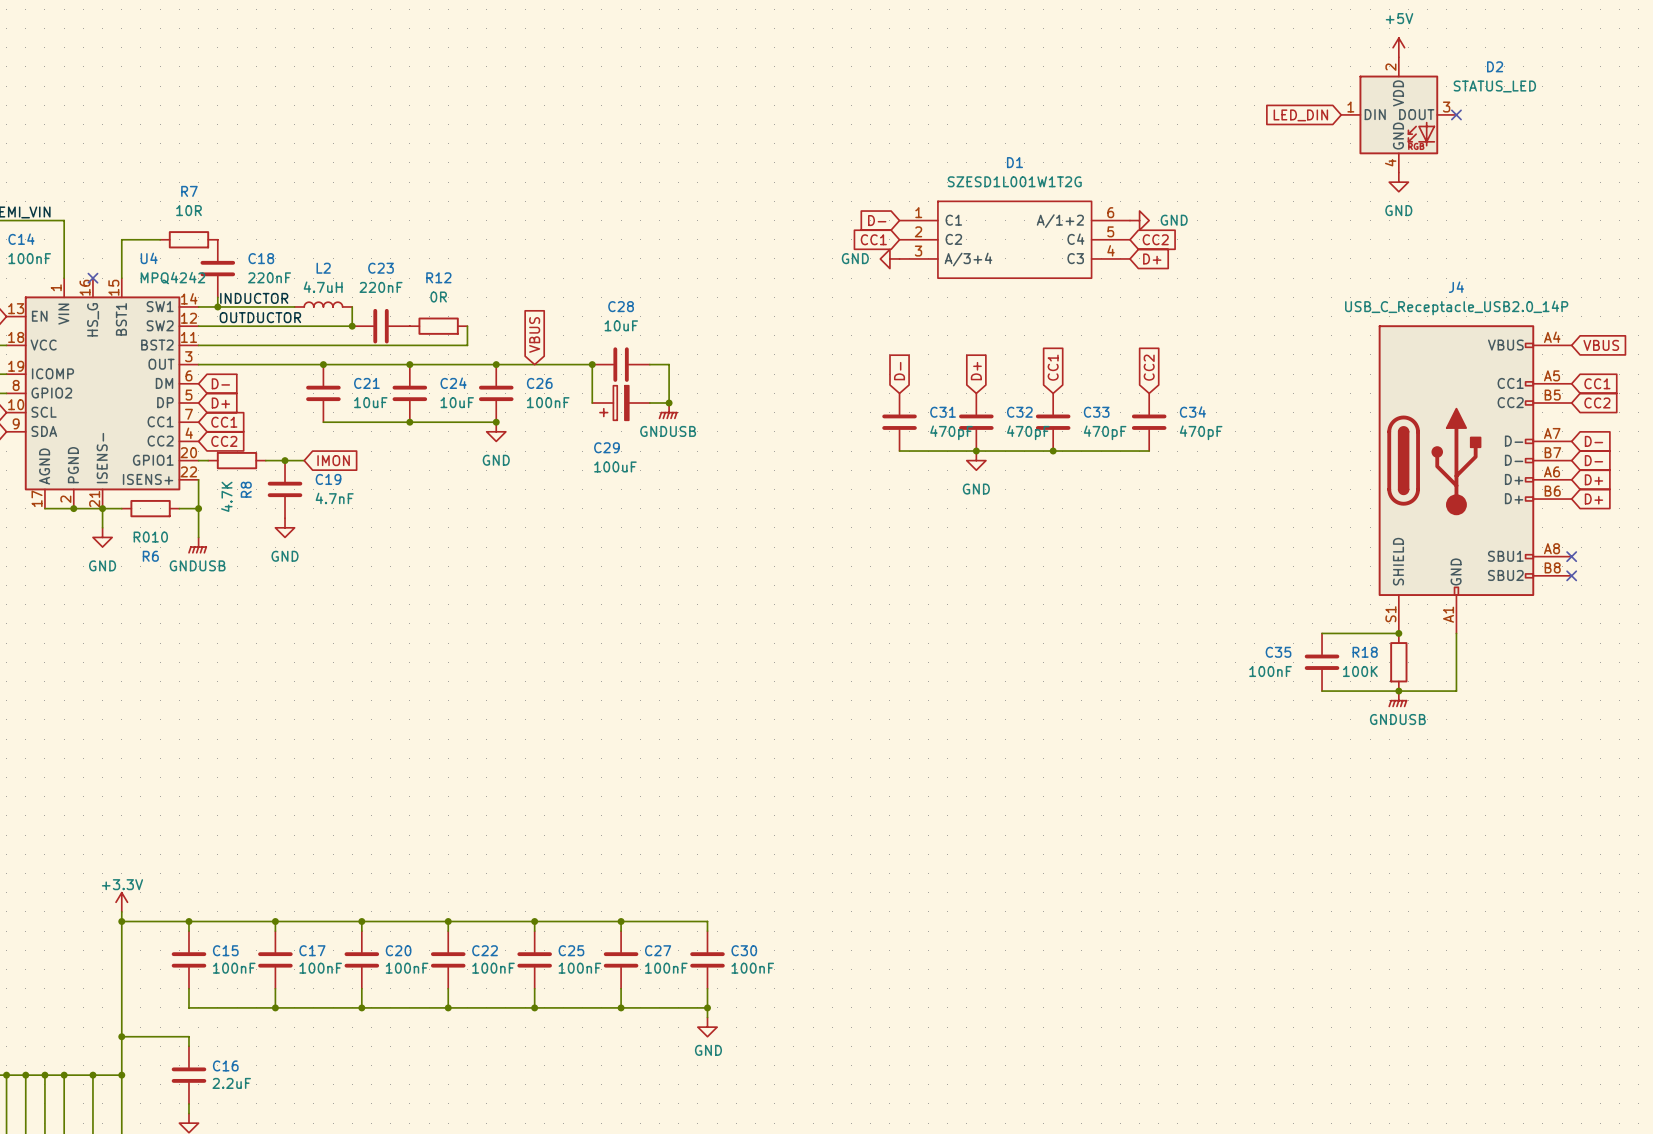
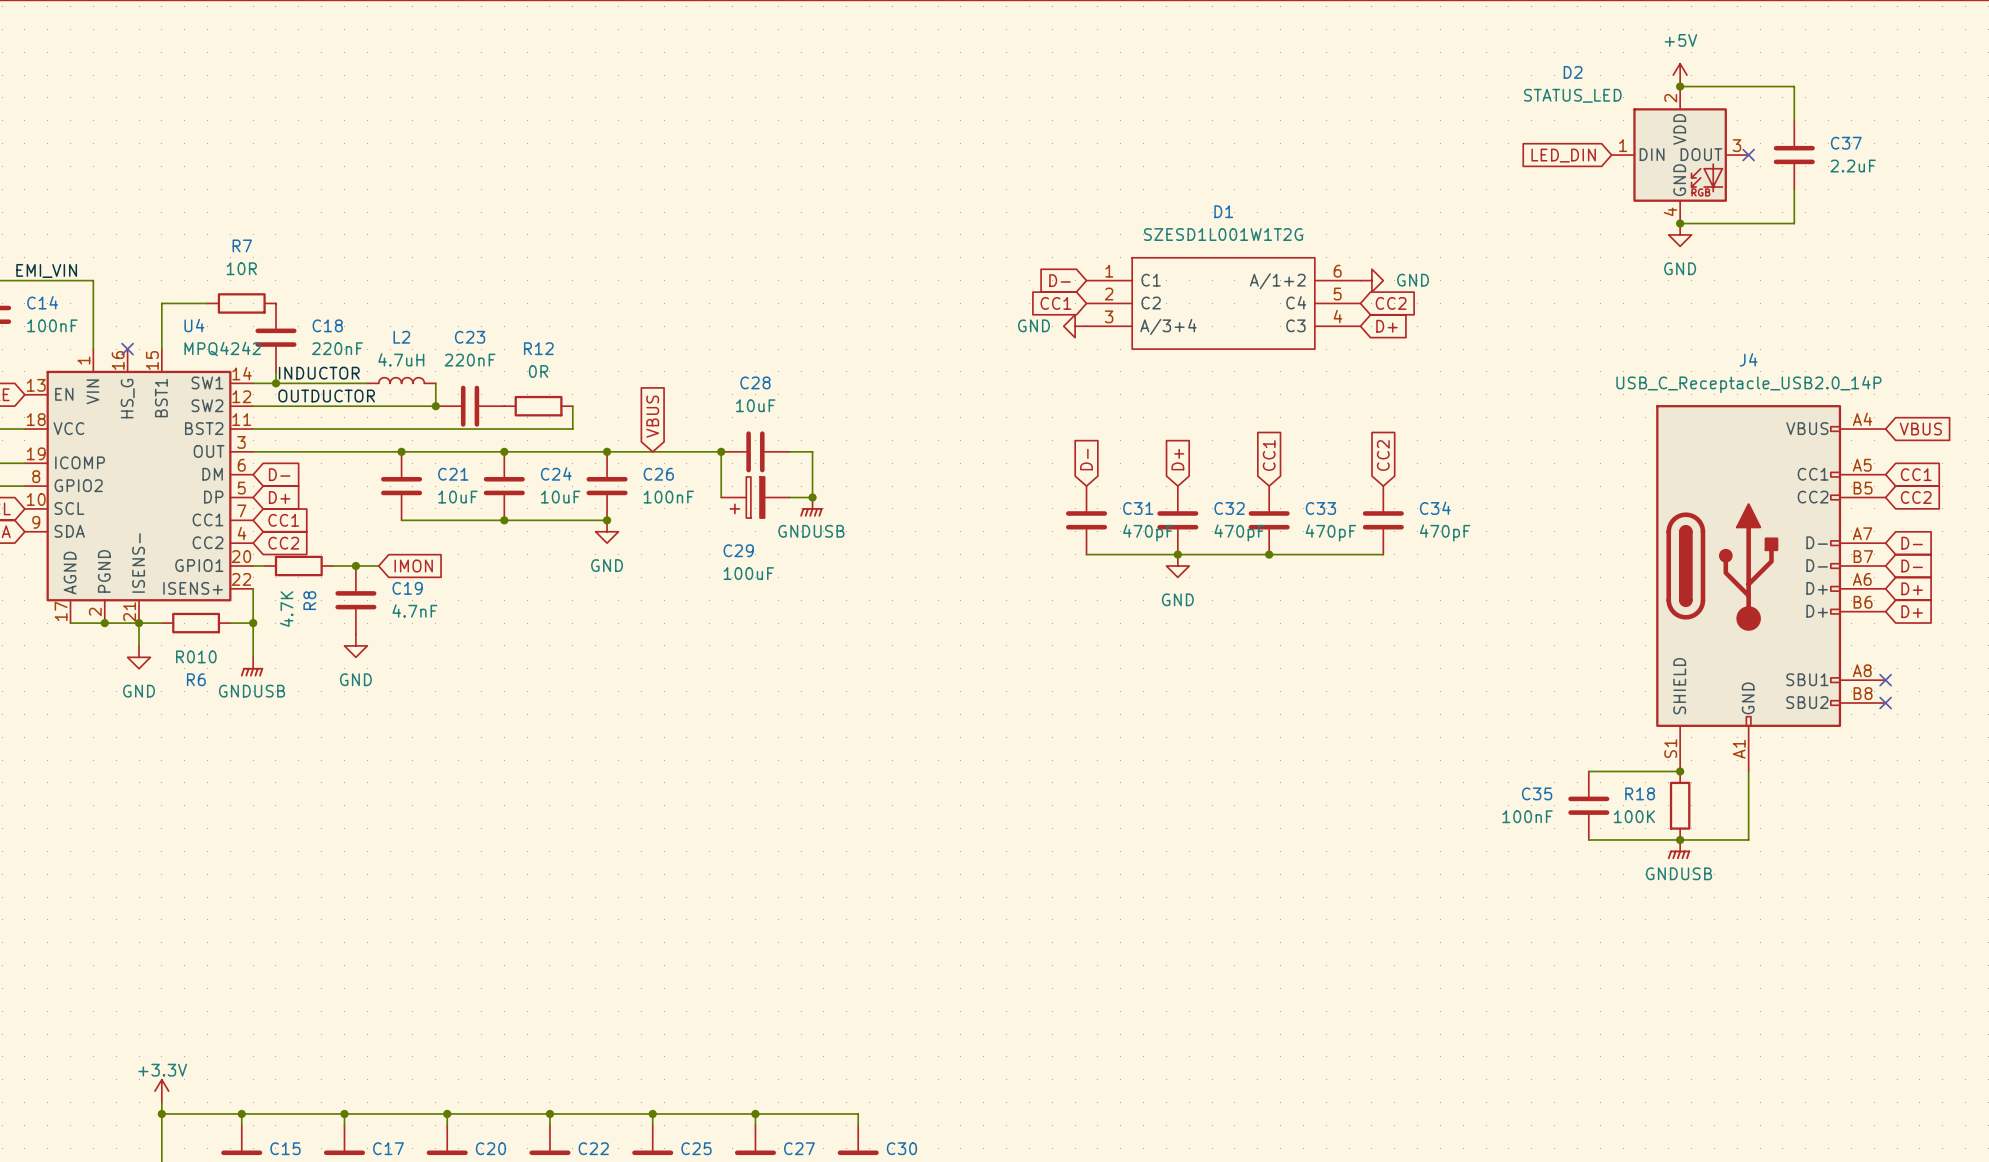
wire: none -> (1680, 86) (1794, 86) (1794, 120)
junction: none -> (1680, 86)
D2 name position: D2 (1495, 66) -> D2 (1573, 72)
D2 value position: STATUS_LED (1494, 86) -> STATUS_LED (1572, 95)
C37: none -> 2.2uF (1794, 155)
wire: none -> (1794, 189) (1794, 223) (1680, 223)
junction: none -> (1680, 223)

